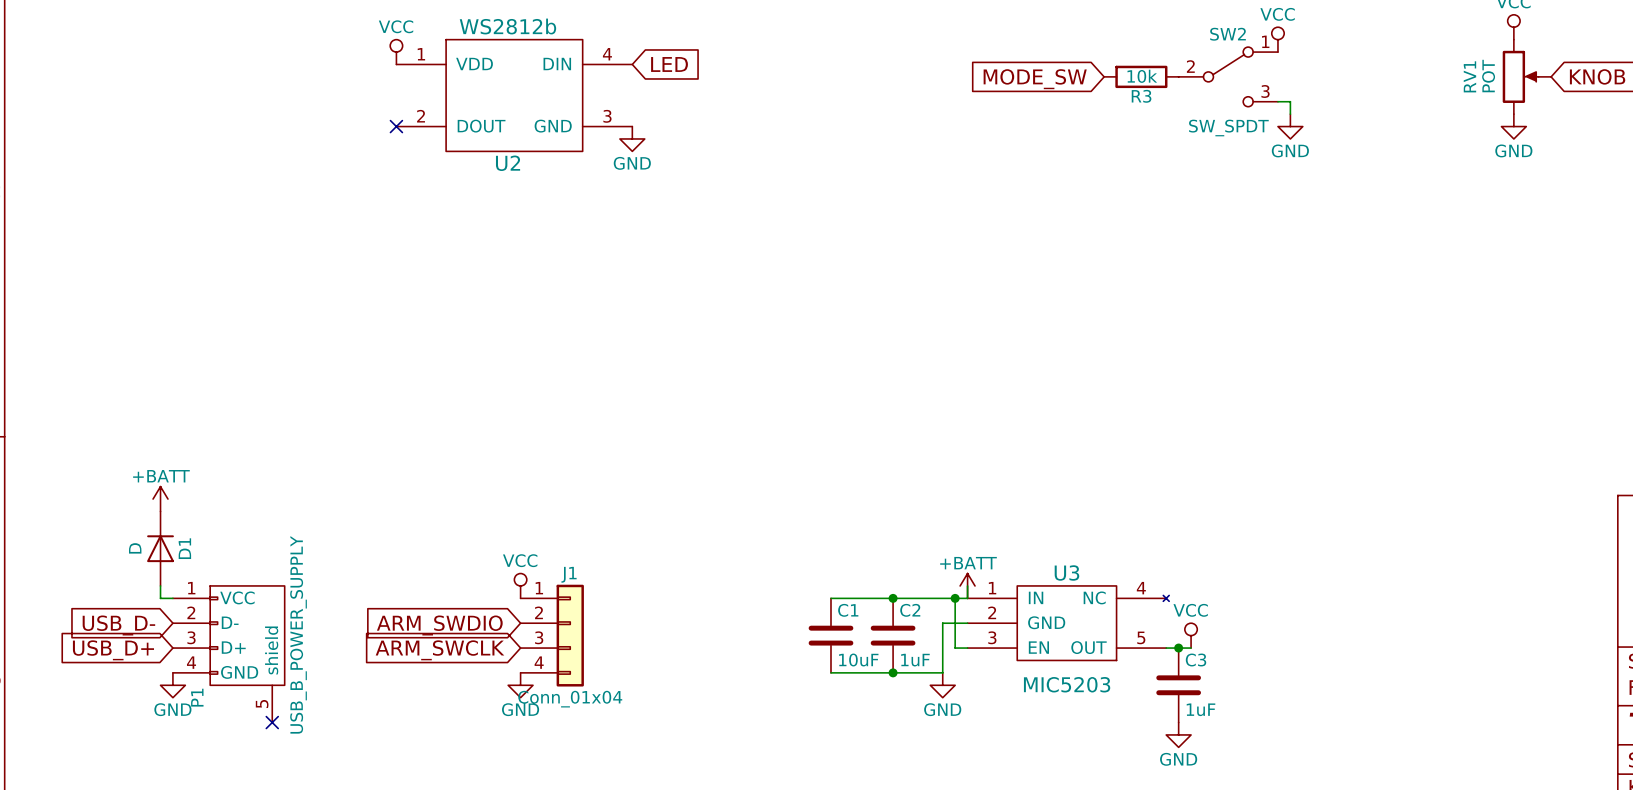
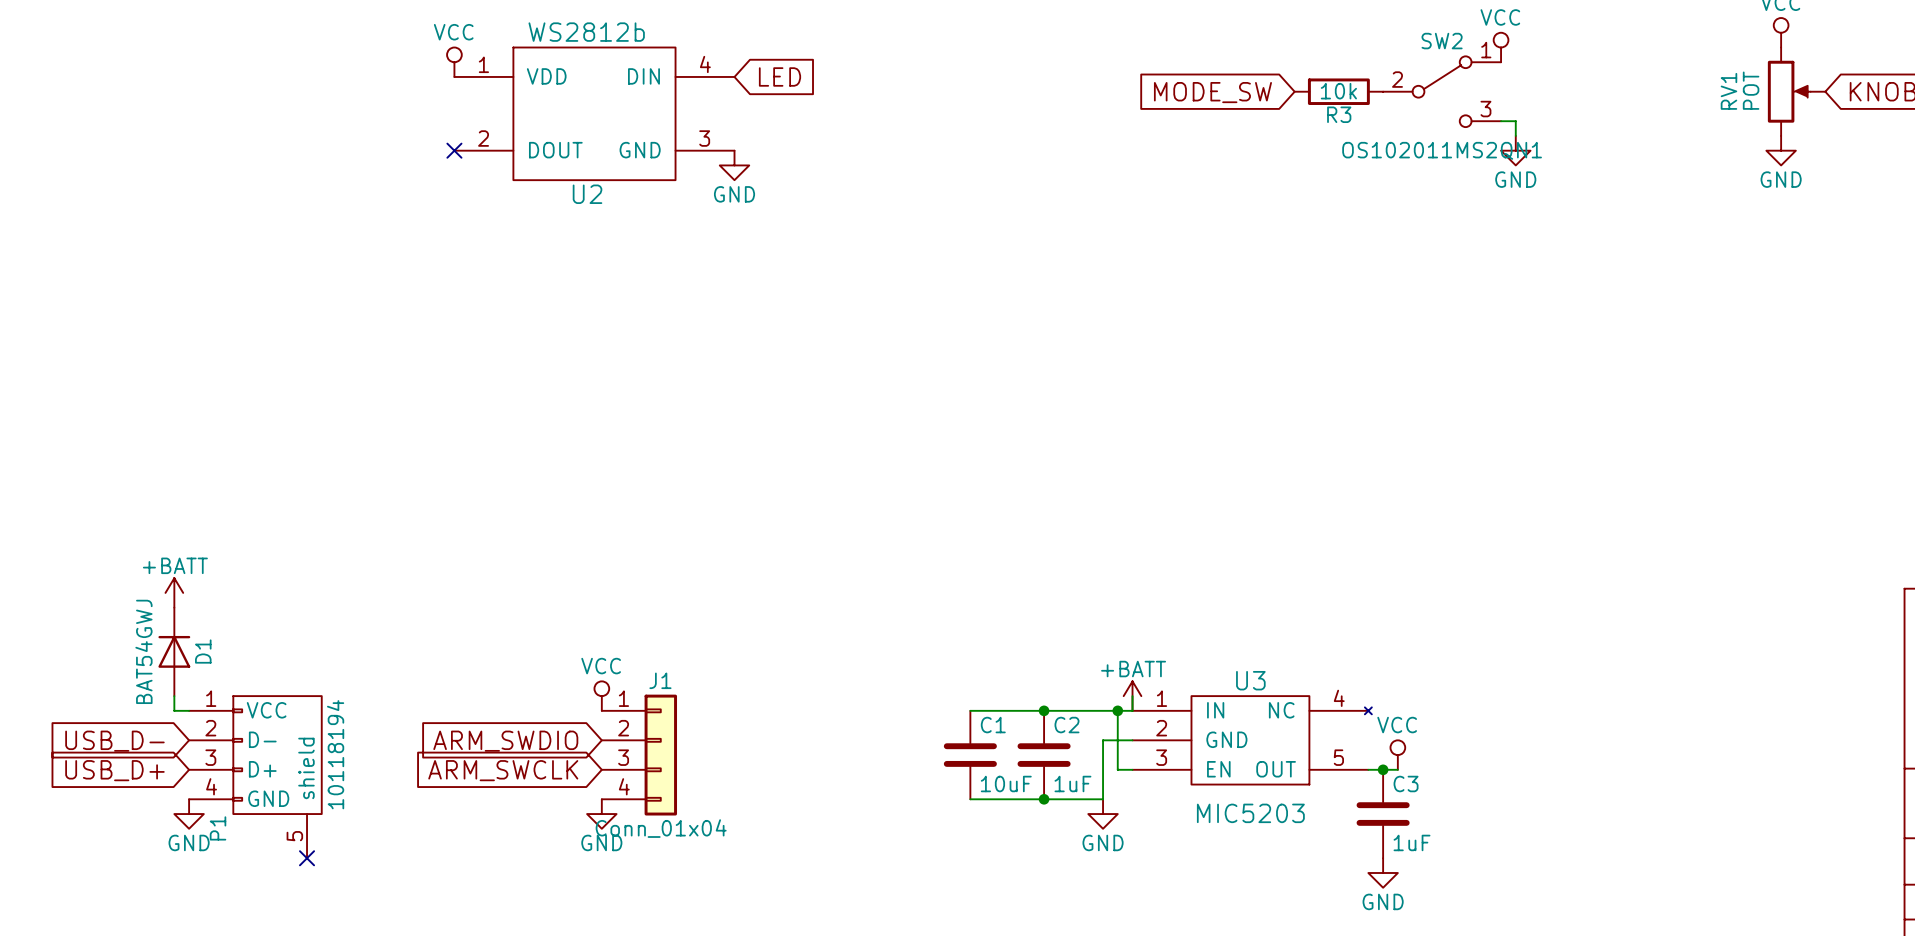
SW2 value: SW_SPDT (1228, 127) -> OS102011MS2QN1 (1442, 150)
D1 value: D (135, 548) -> BAT54GWJ (143, 651)
P1 value: USB_B_POWER_SUPPLY (298, 634) -> 10118194 (335, 754)

